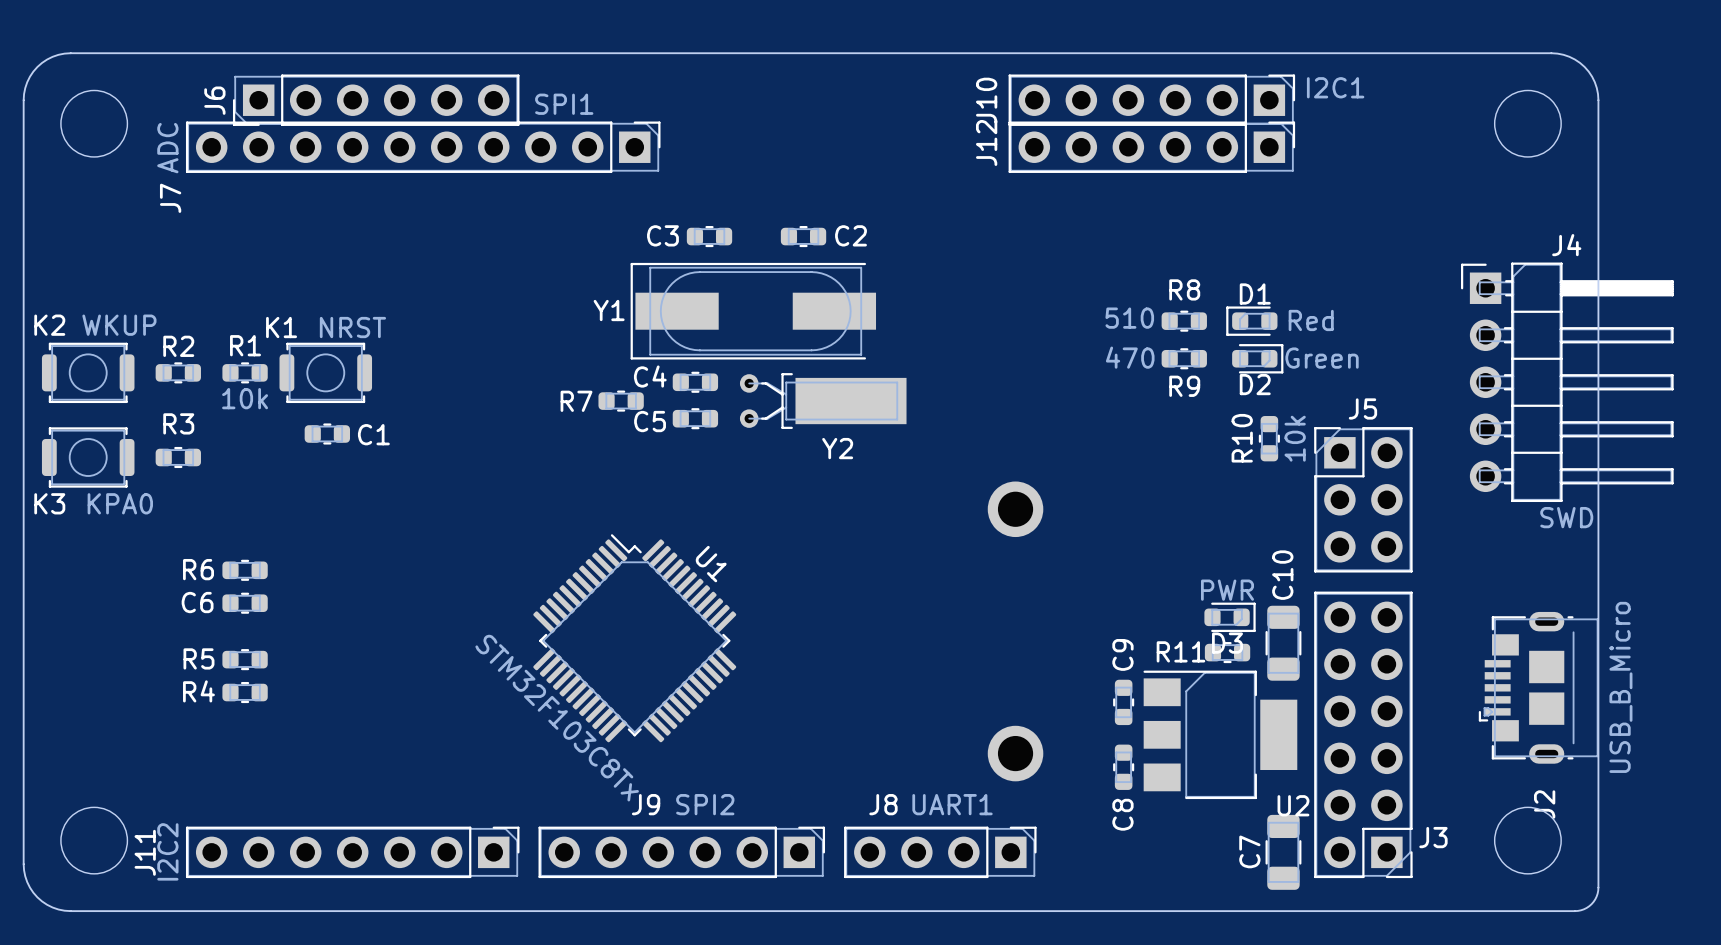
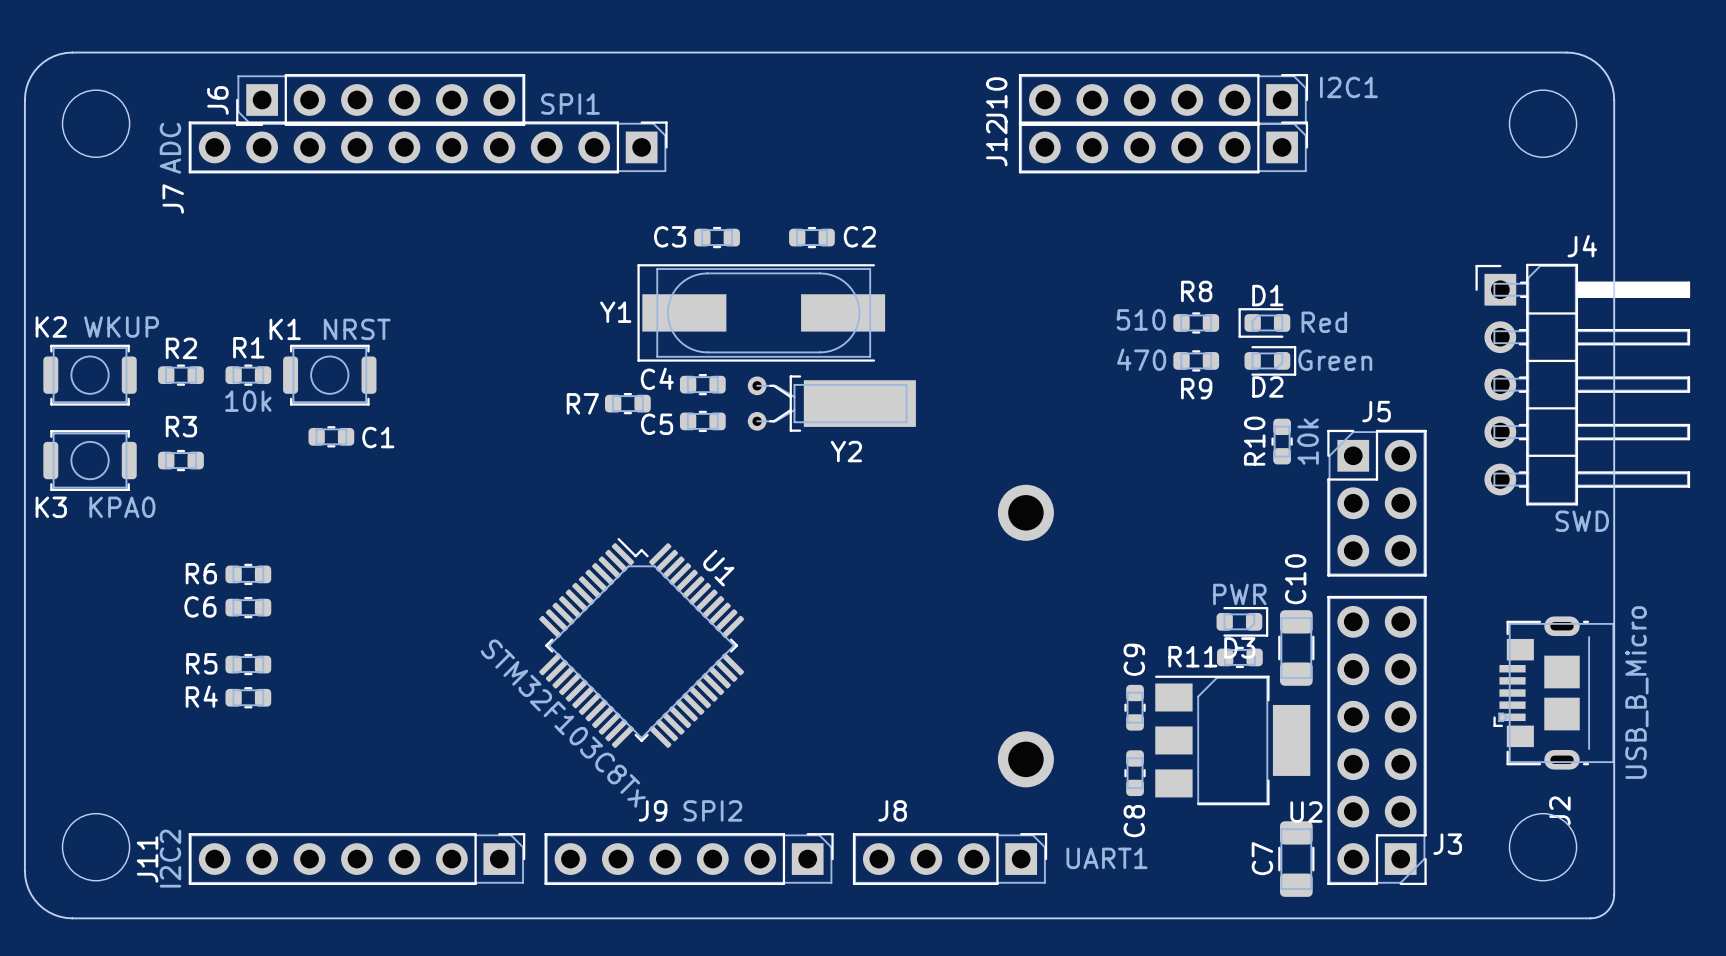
J8 value position: UART1 (952, 804) -> UART1 (1107, 858)

